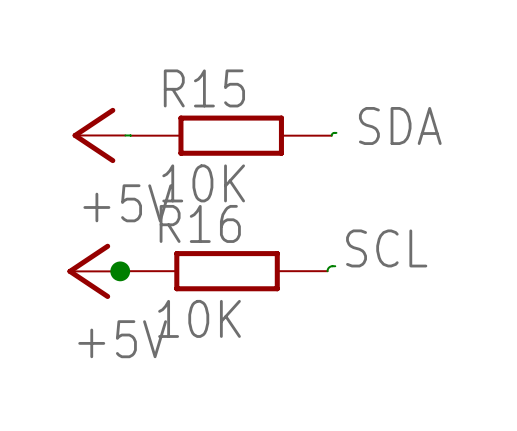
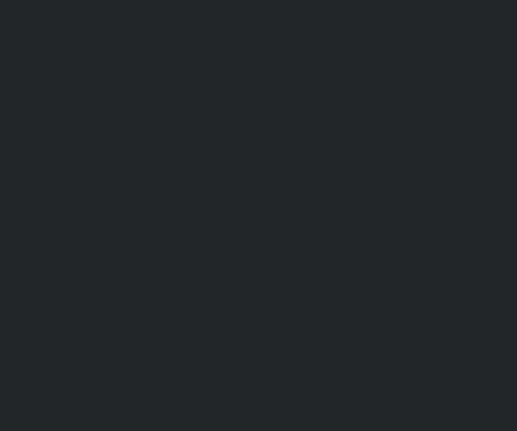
label: SDA (400, 125) -> none
wire: (336, 132) (331, 135) -> none
power symbol: +5V (98, 135) -> none
wire: (125, 135) (130, 135) -> none
R15: 10K (231, 135) -> none
label: SCL (386, 248) -> none
wire: (335, 266) (330, 266) (327, 271) -> none
power symbol: +5V (93, 271) -> none
junction: (120, 271) -> none
R16: 10K (227, 271) -> none

